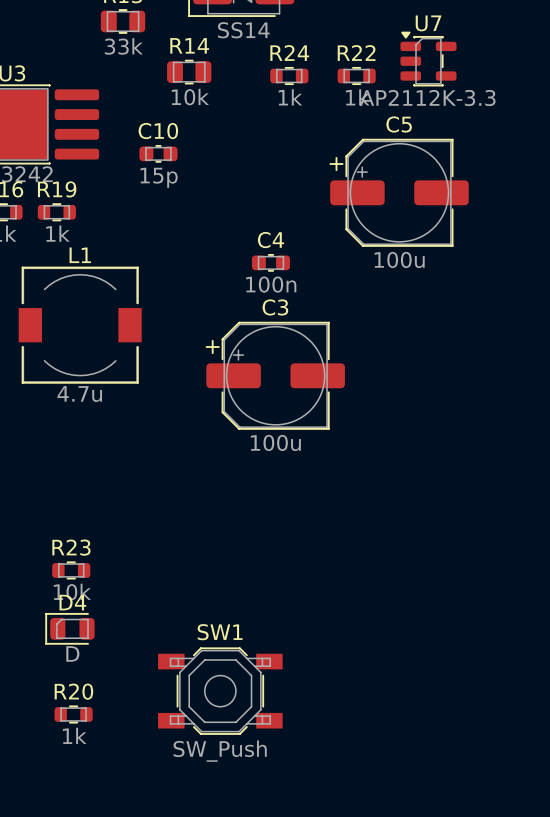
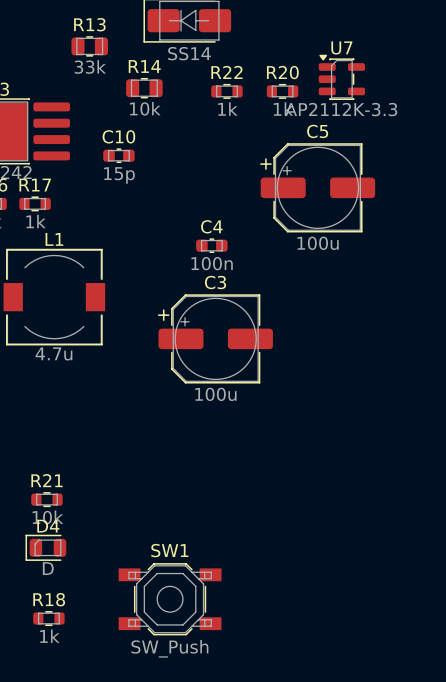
R24 name: R24 (289, 53) -> R22 (226, 72)
R22 name: R22 (356, 53) -> R20 (282, 72)
R19 name: R19 (57, 189) -> R17 (35, 185)
R23 name: R23 (71, 547) -> R21 (47, 480)
R20 name: R20 (73, 691) -> R18 (49, 599)

